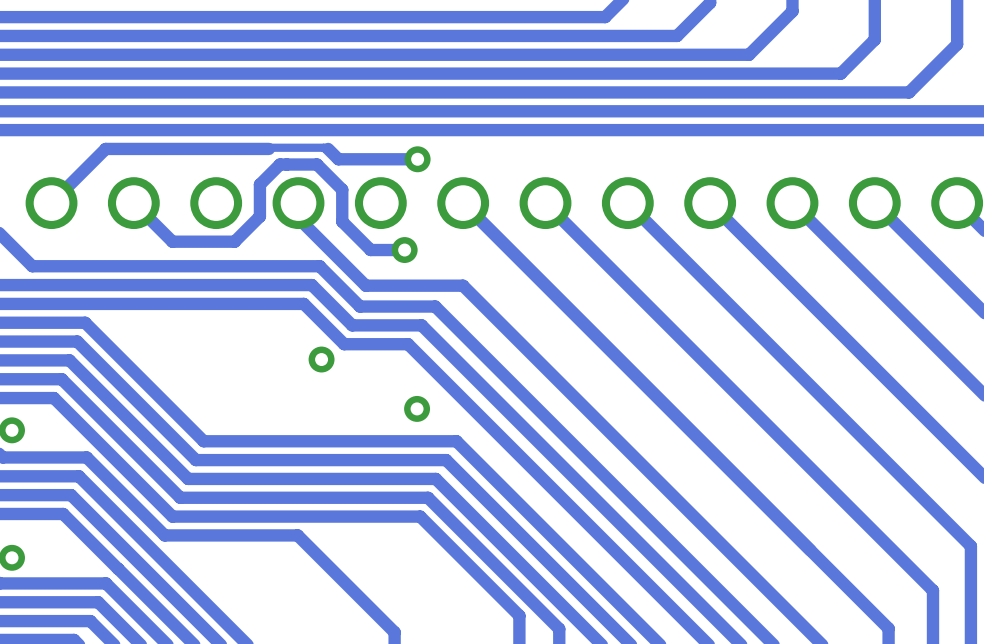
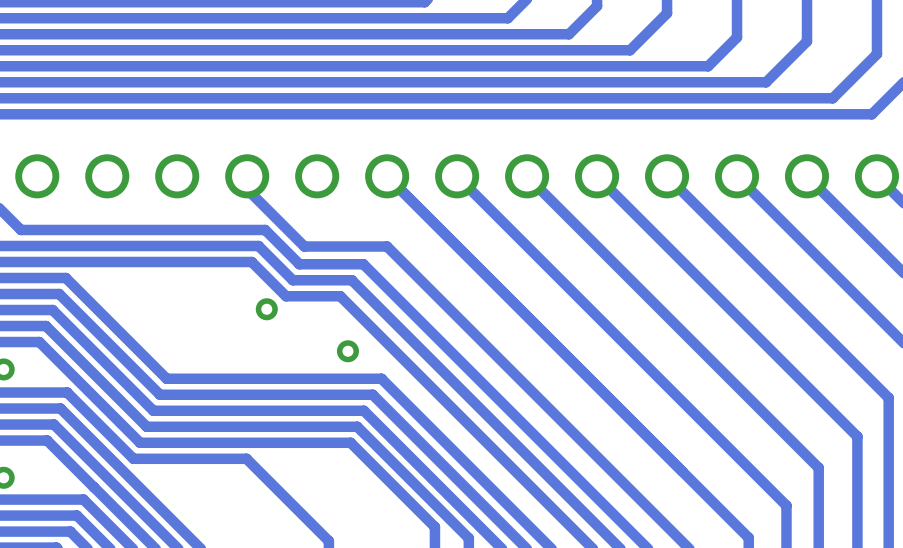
track: (417, 159) (338, 159) (328, 148) (323, 147) (105, 148) (51, 203) -> none
via: (417, 159) -> none
track: (133, 203) (172, 241) (234, 241) (259, 216) (259, 184) (279, 164) (317, 164) (342, 189) (342, 221) (370, 250) (404, 250) -> none
via: (404, 250) -> none

